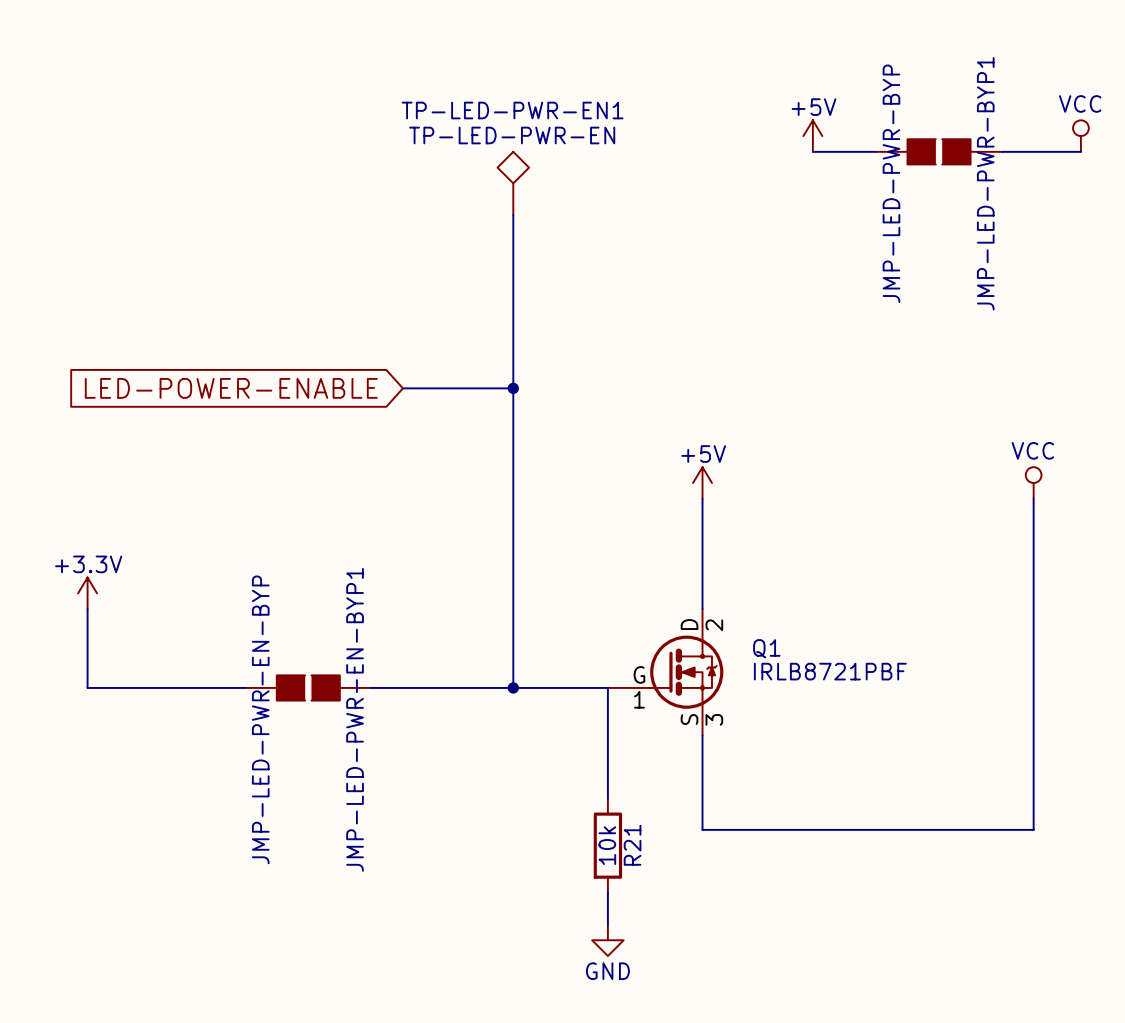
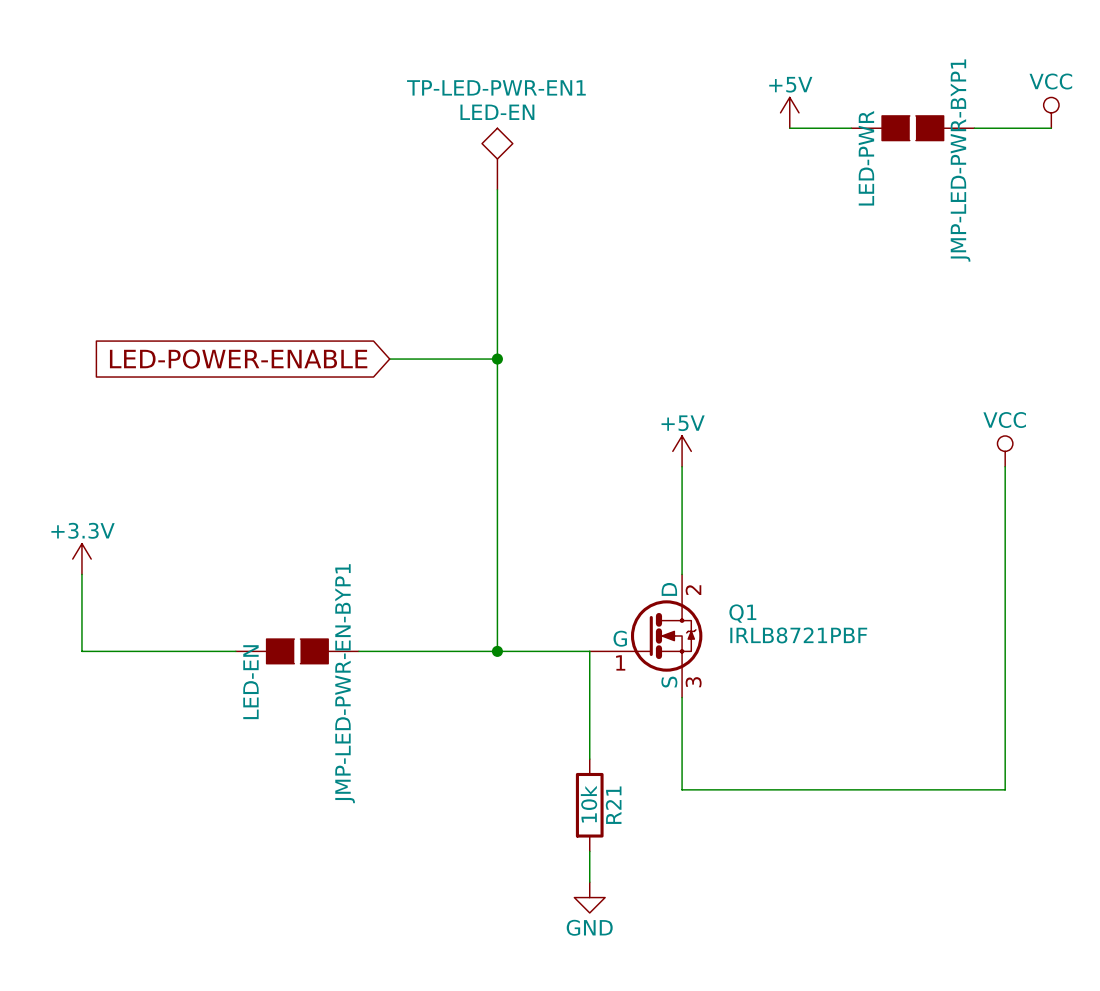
TP-LED-PWR-EN1 value: TP-LED-PWR-EN (512, 135) -> LED-EN (497, 112)
JMP-LED-PWR-BYP1 value: JMP-LED-PWR-BYP (891, 183) -> LED-PWR (866, 158)
JMP-LED-PWR-EN-BYP1 value: JMP-LED-PWR-EN-BYP (260, 719) -> LED-EN (250, 682)

